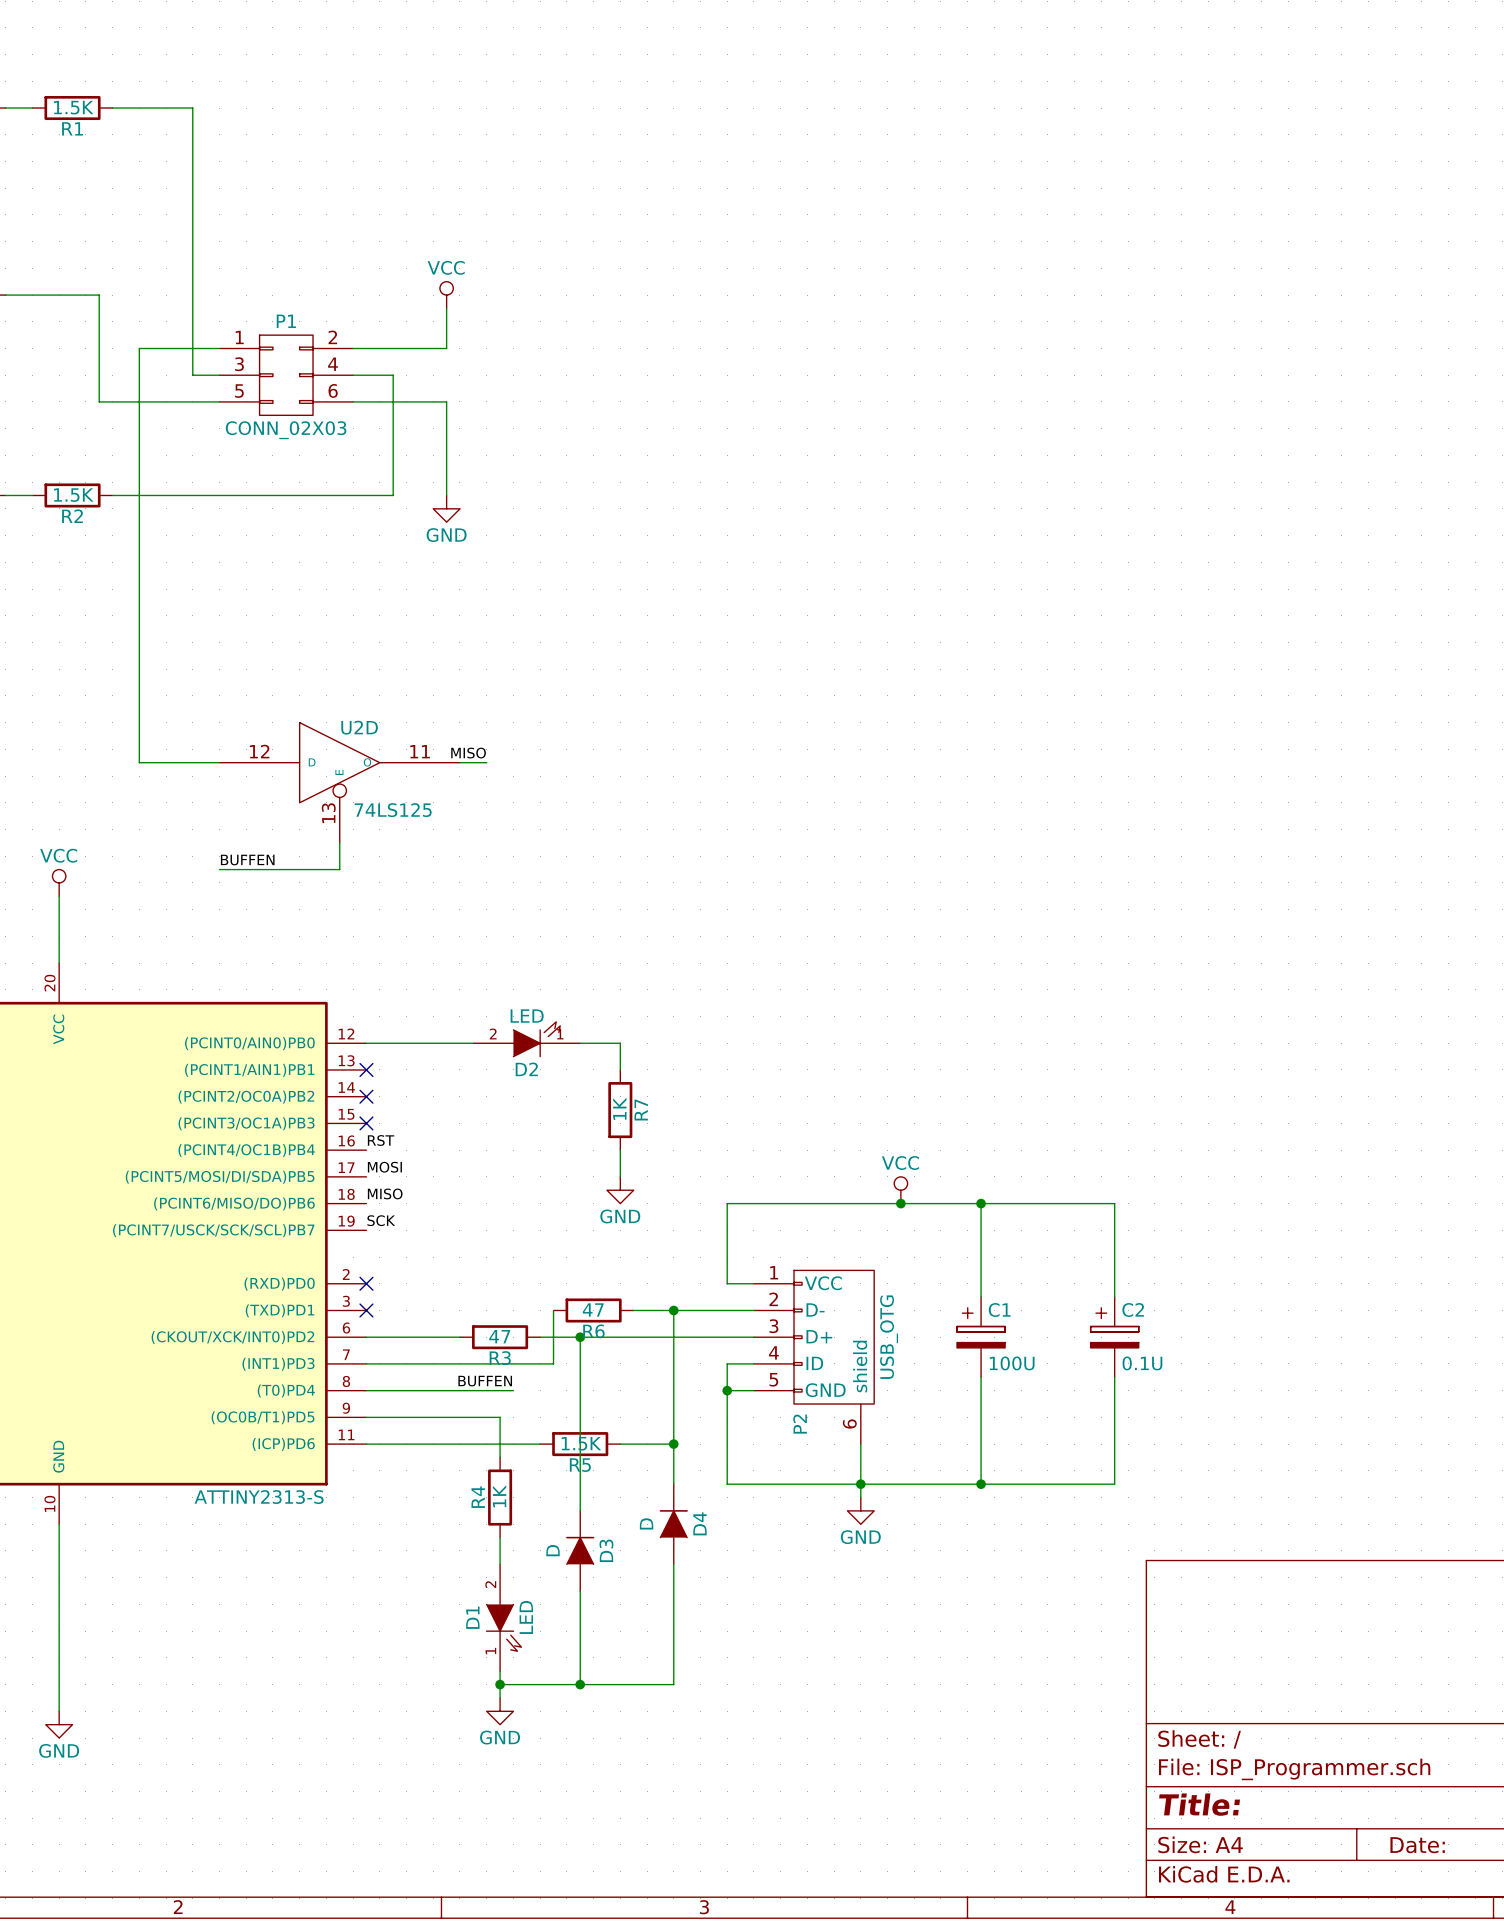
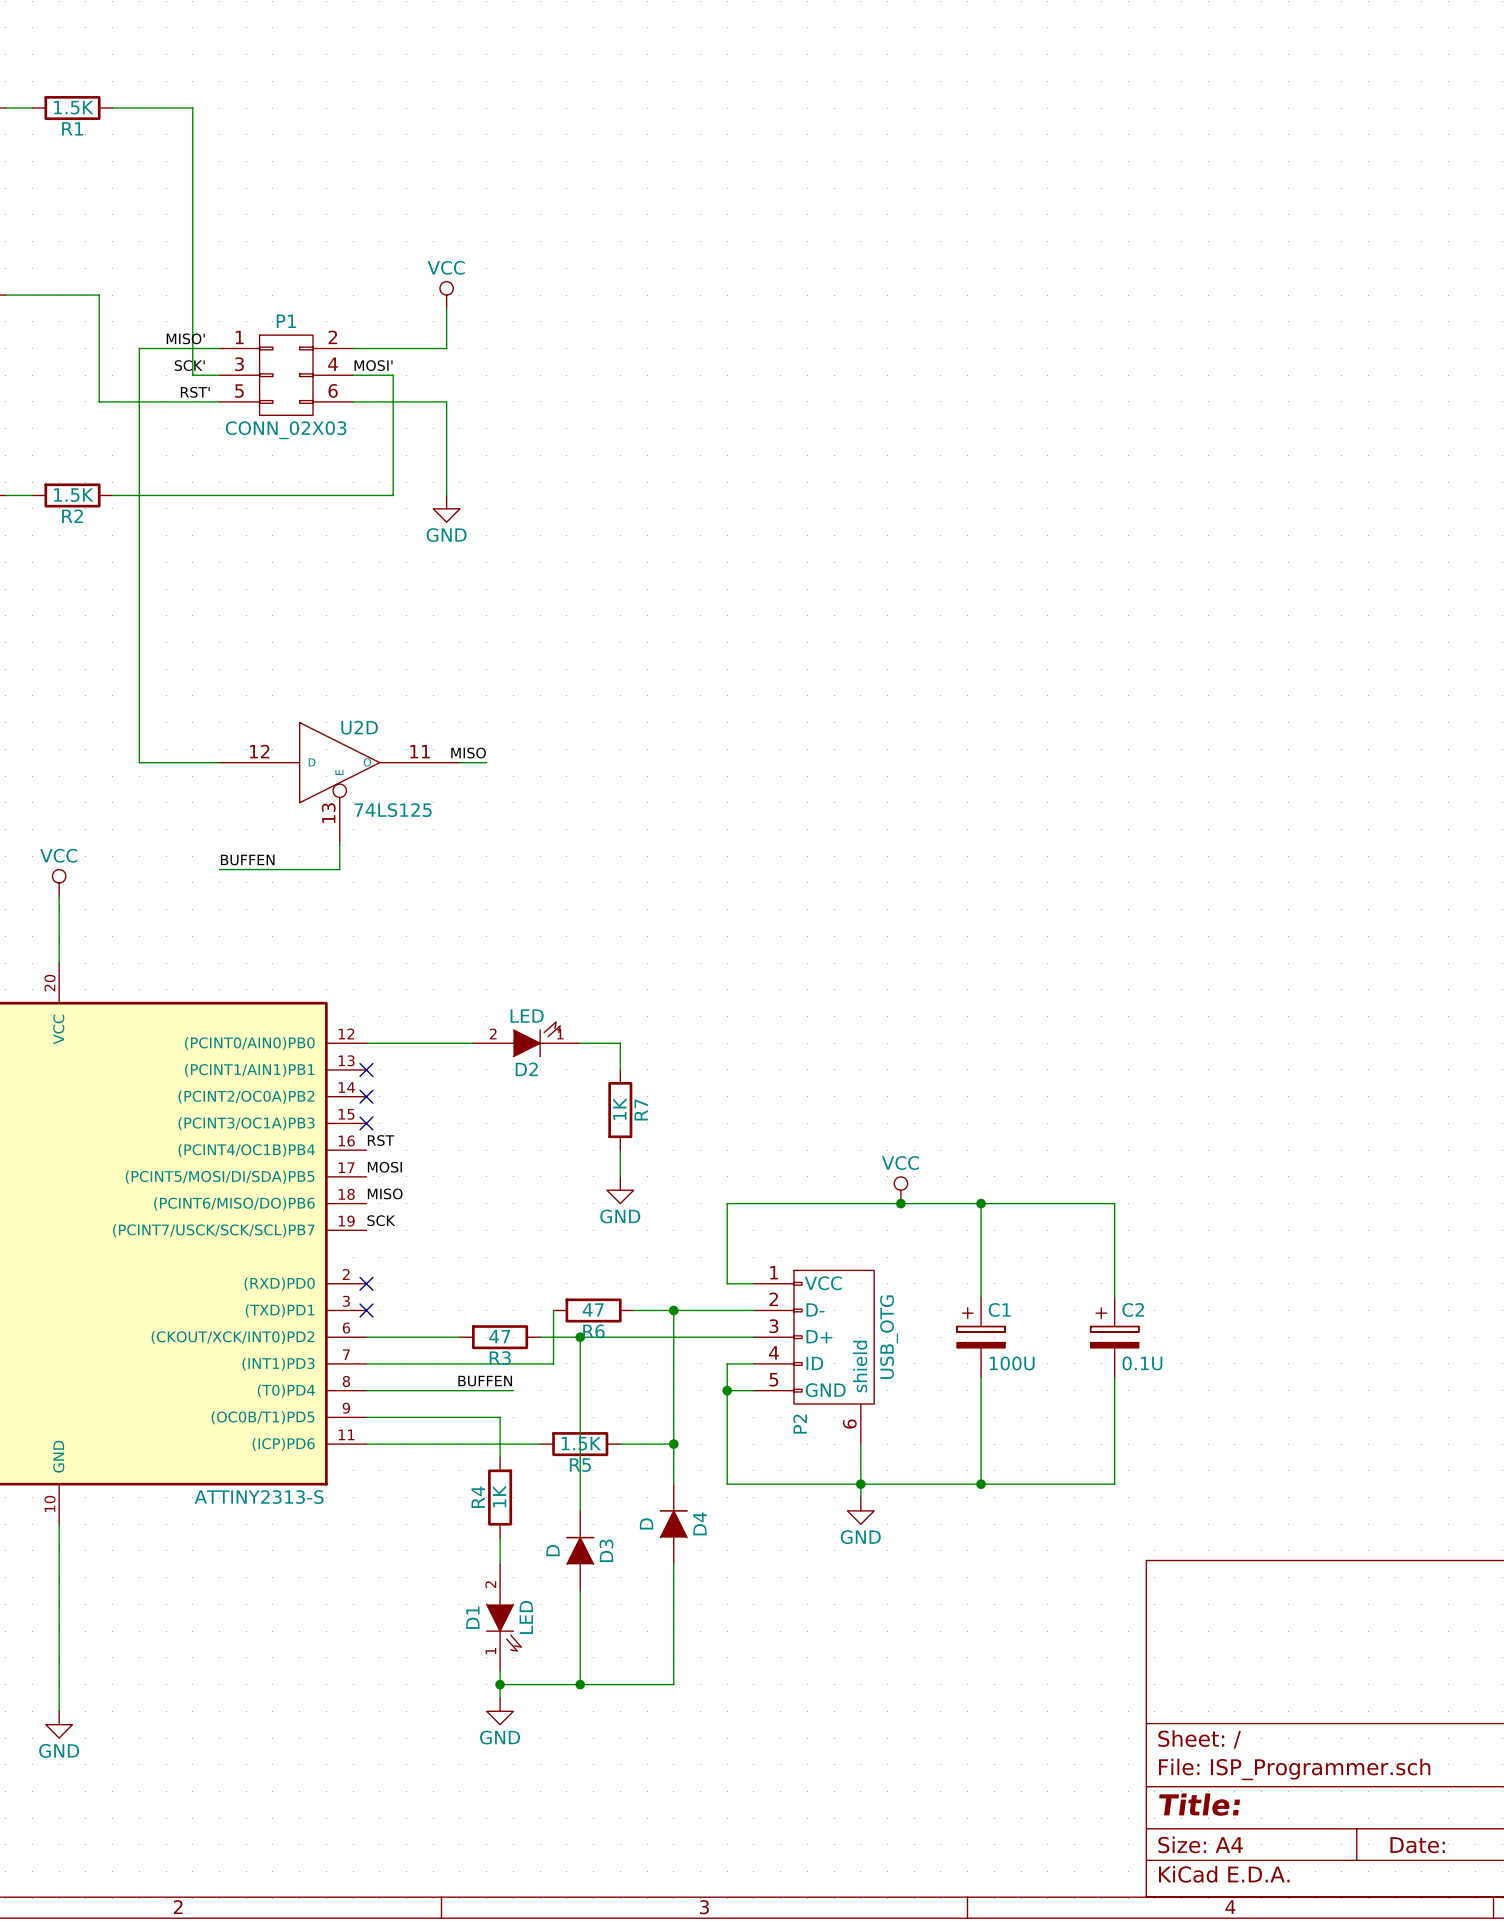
label: none -> MISO' (185, 338)
label: none -> SCK' (189, 365)
label: none -> MOSI' (373, 365)
label: none -> RST' (195, 392)

